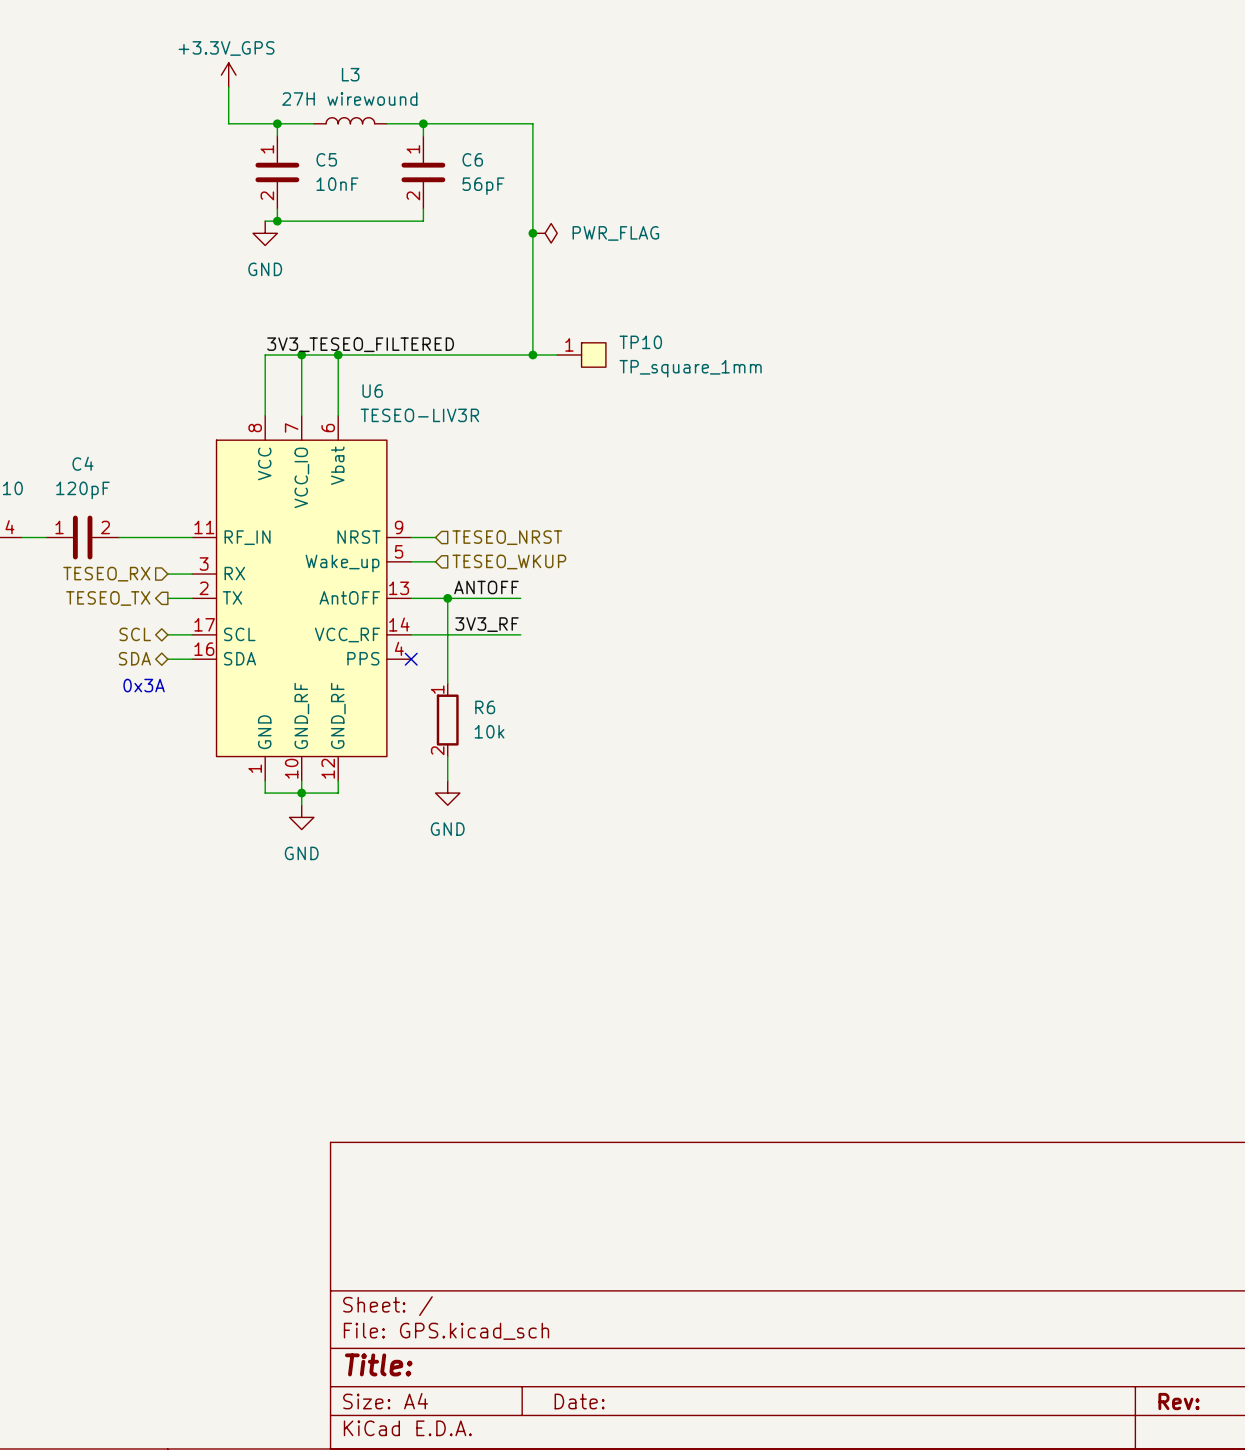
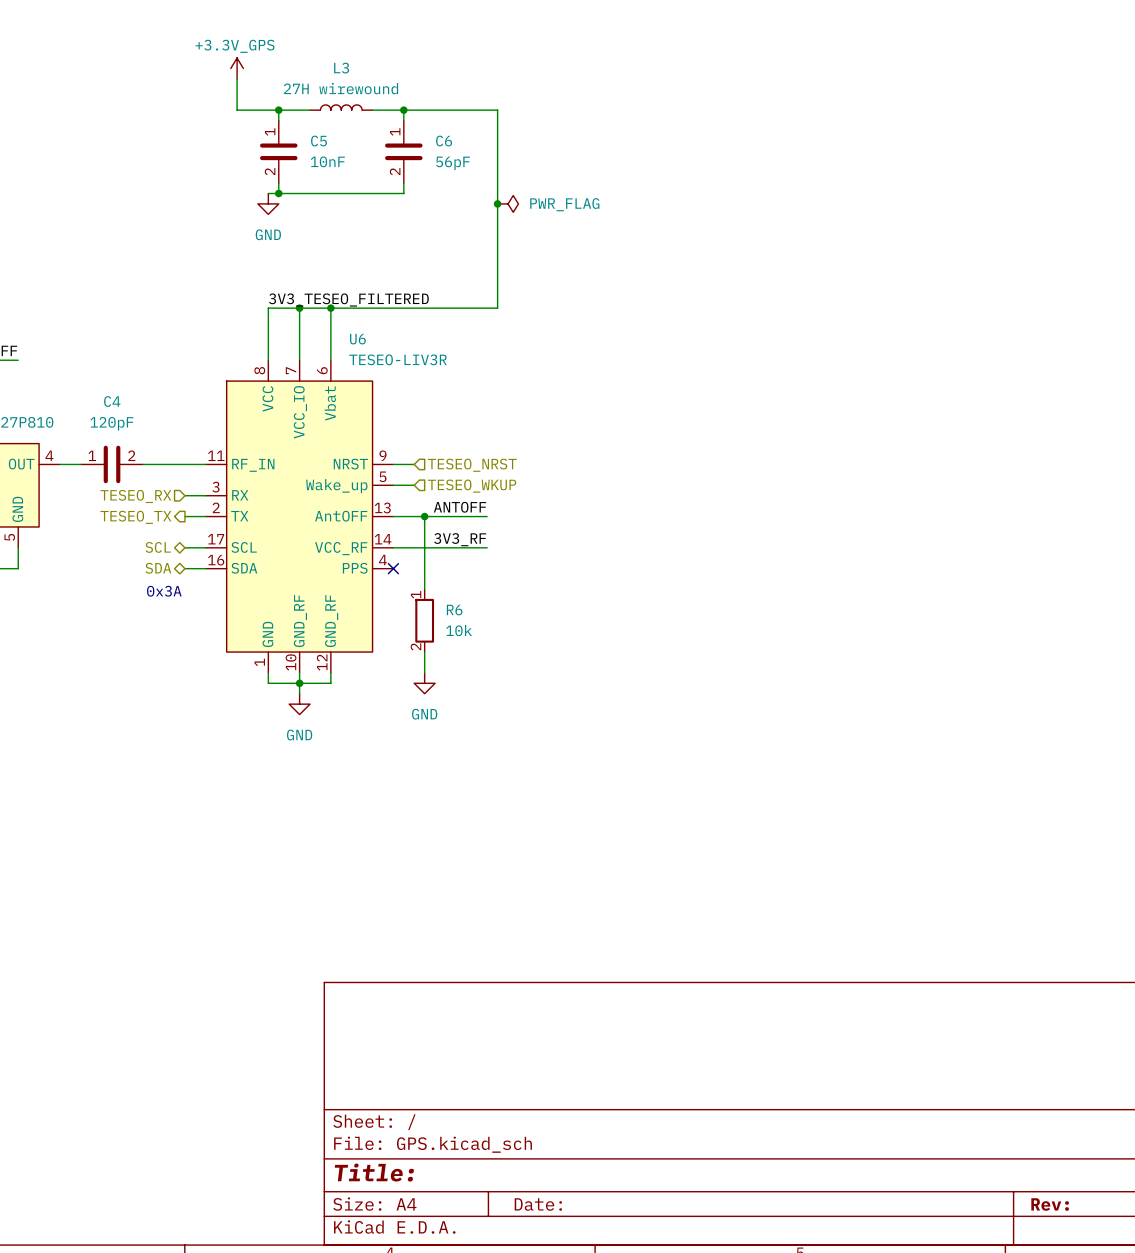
wire: (532, 354) (557, 354) -> none
junction: (532, 354) -> none
TP10: TP_square_1mm (581, 354) -> none

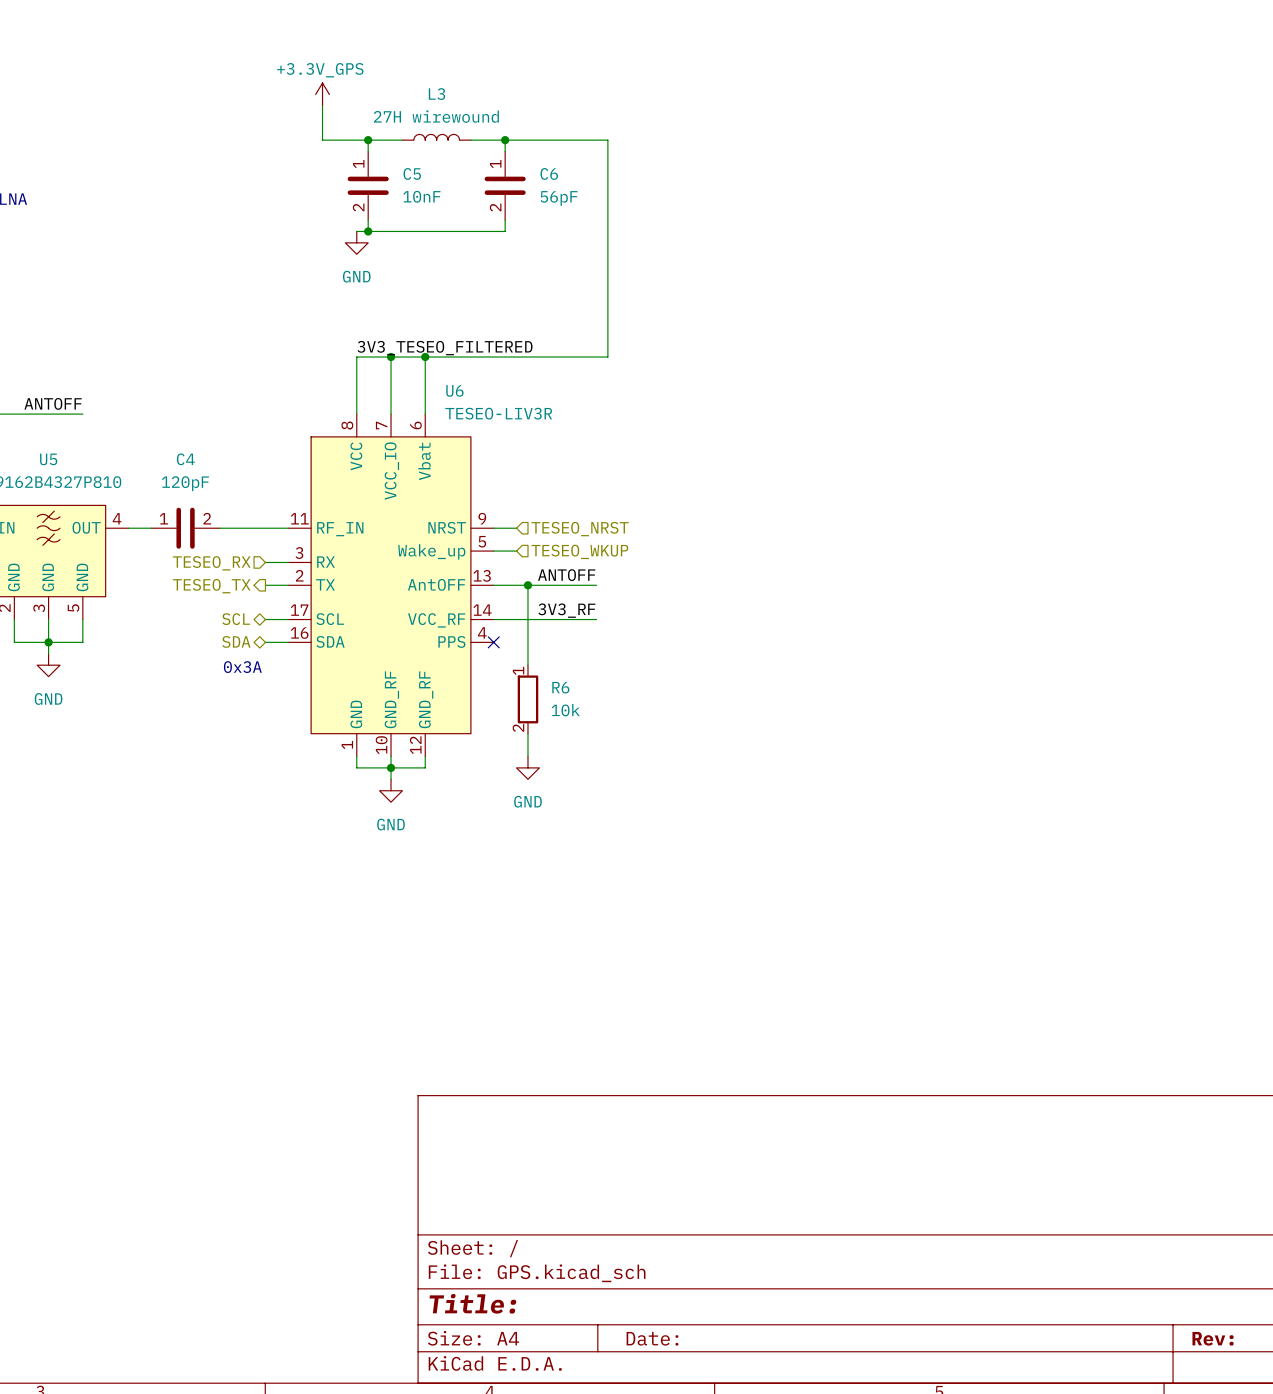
junction: (497, 203) -> none
power symbol: PWR_FLAG (508, 203) -> none

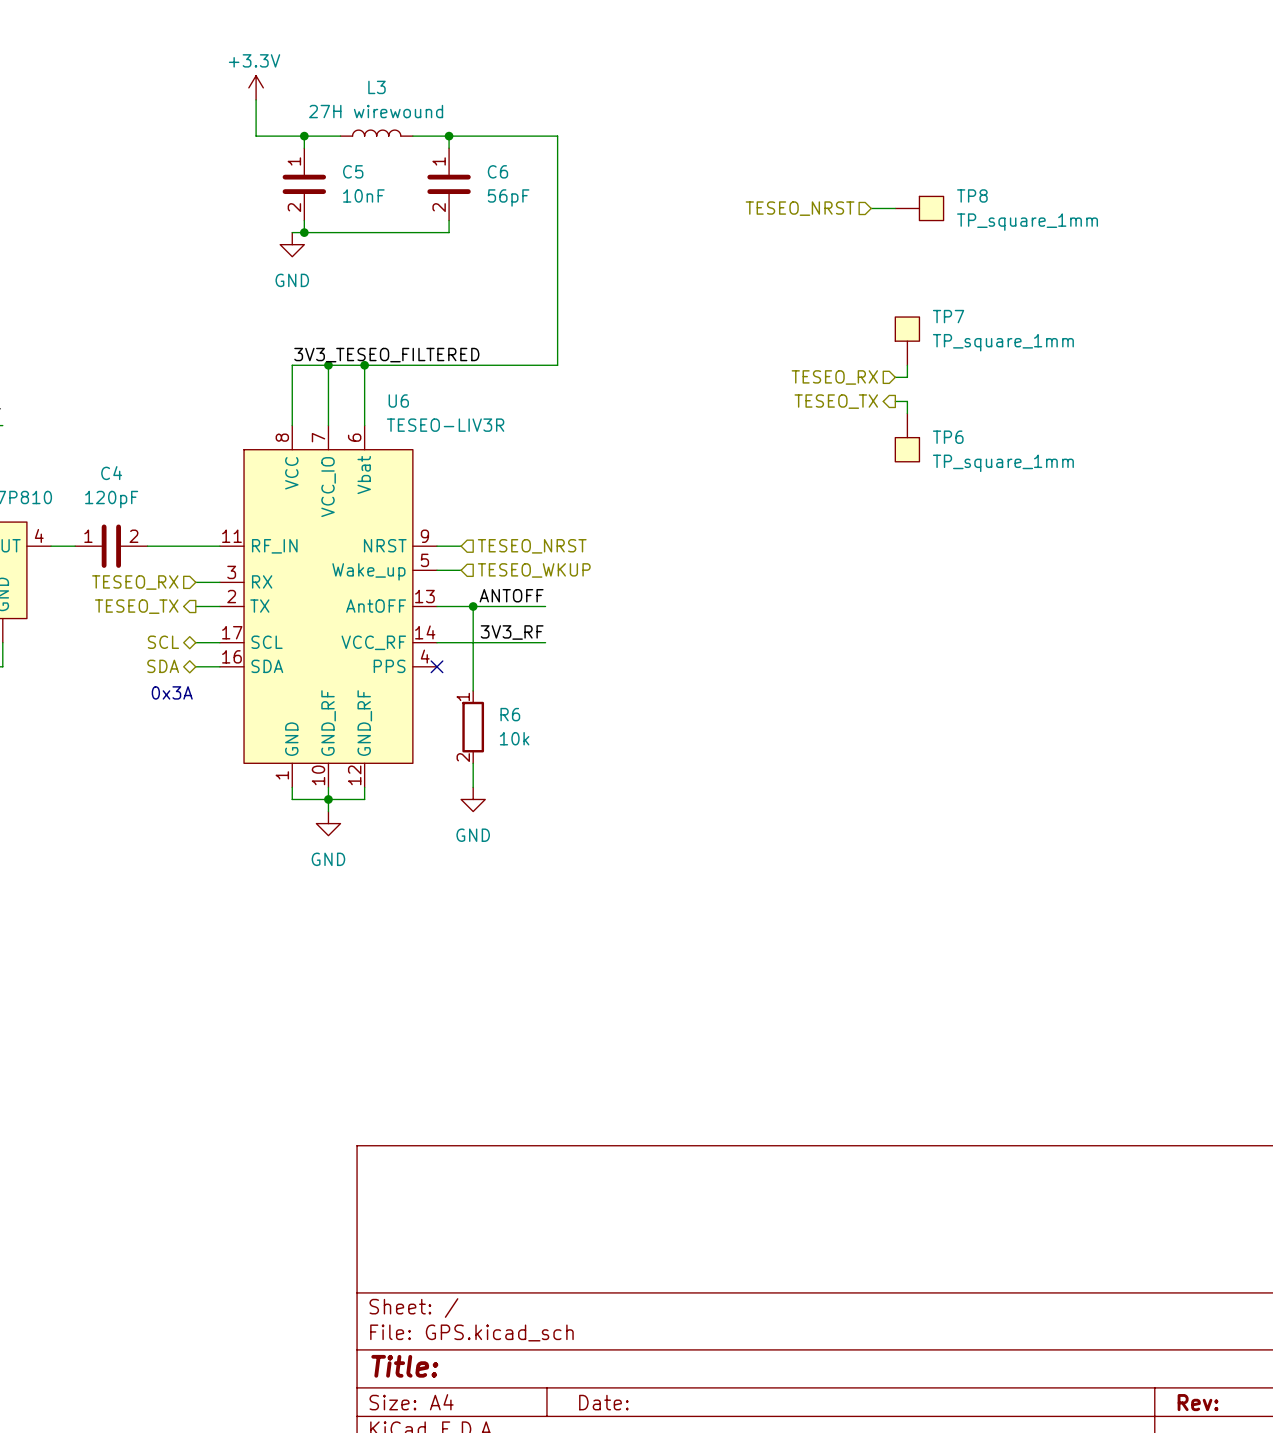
power symbol: +3.3V_GPS (322, 94) -> +3.3V (256, 87)
wire: none -> (871, 208) (895, 208)
TP8: none -> TP_square_1mm (919, 208)
hierarchical label: none -> TESEO_NRST (800, 208)
TP7: none -> TP_square_1mm (907, 341)
wire: none -> (907, 365) (907, 377) (895, 377)
hierarchical label: none -> TESEO_RX (834, 377)
wire: none -> (895, 401) (907, 401) (907, 413)
hierarchical label: none -> TESEO_TX (836, 401)
TP6: none -> TP_square_1mm (907, 437)

